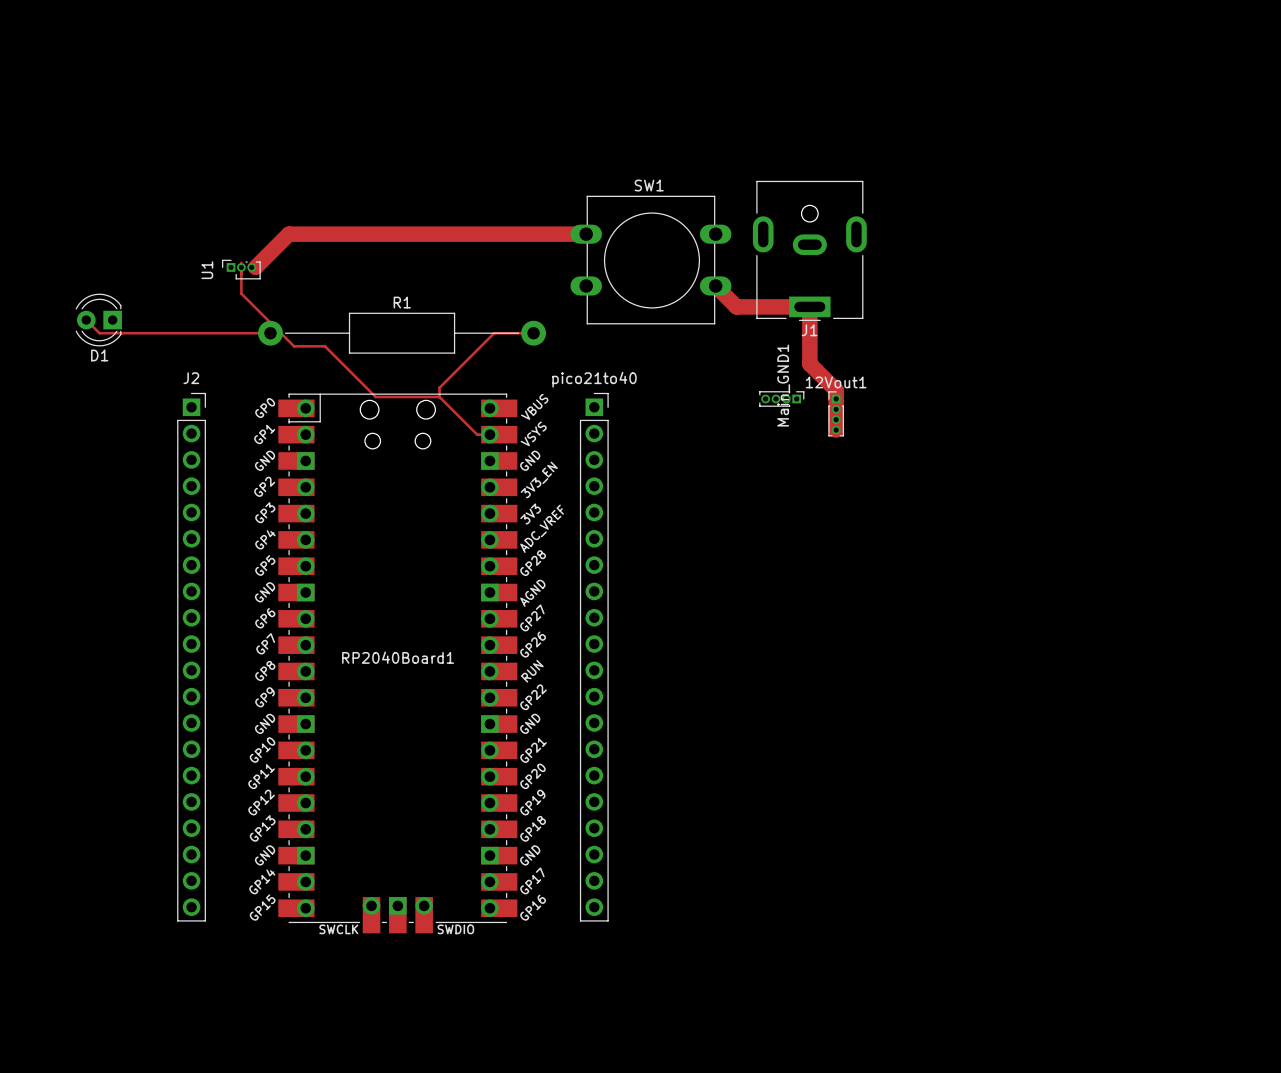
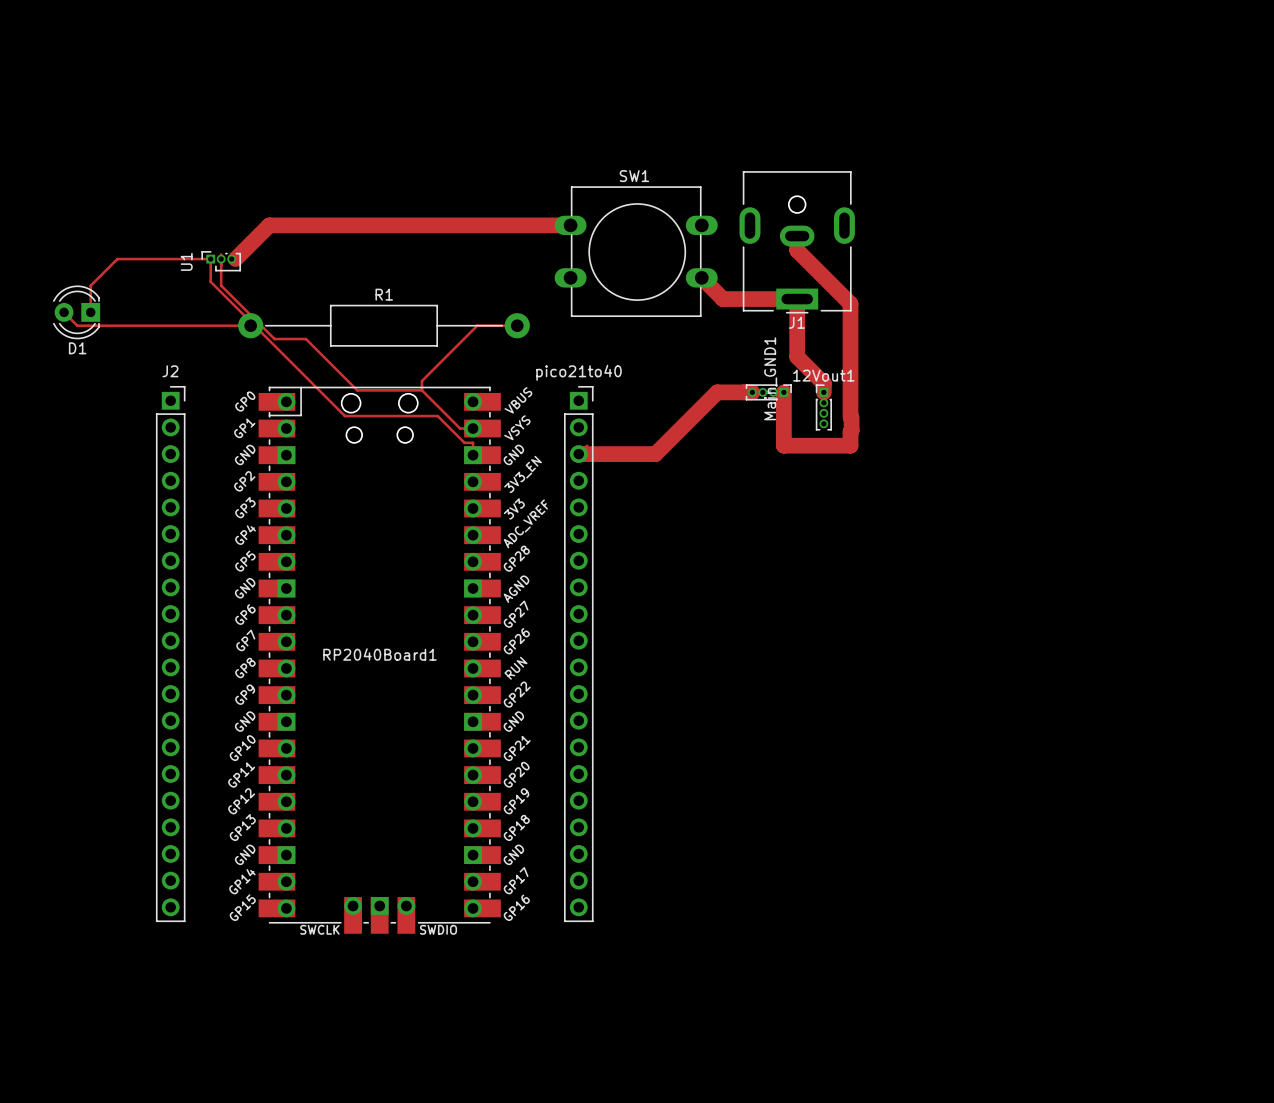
track: none -> (797, 236) (797, 250) (850, 303) (850, 417)
track: none -> (90, 312) (90, 285) (117, 259) (210, 259) (210, 281) (344, 416) (437, 416) (464, 442) (473, 442) (473, 455)
track: none -> (743, 392) (783, 392) (783, 445) (850, 445) (851, 417)
track: none -> (752, 392) (717, 392) (655, 454) (578, 454) (587, 445)
track: (836, 398) (836, 430) -> none

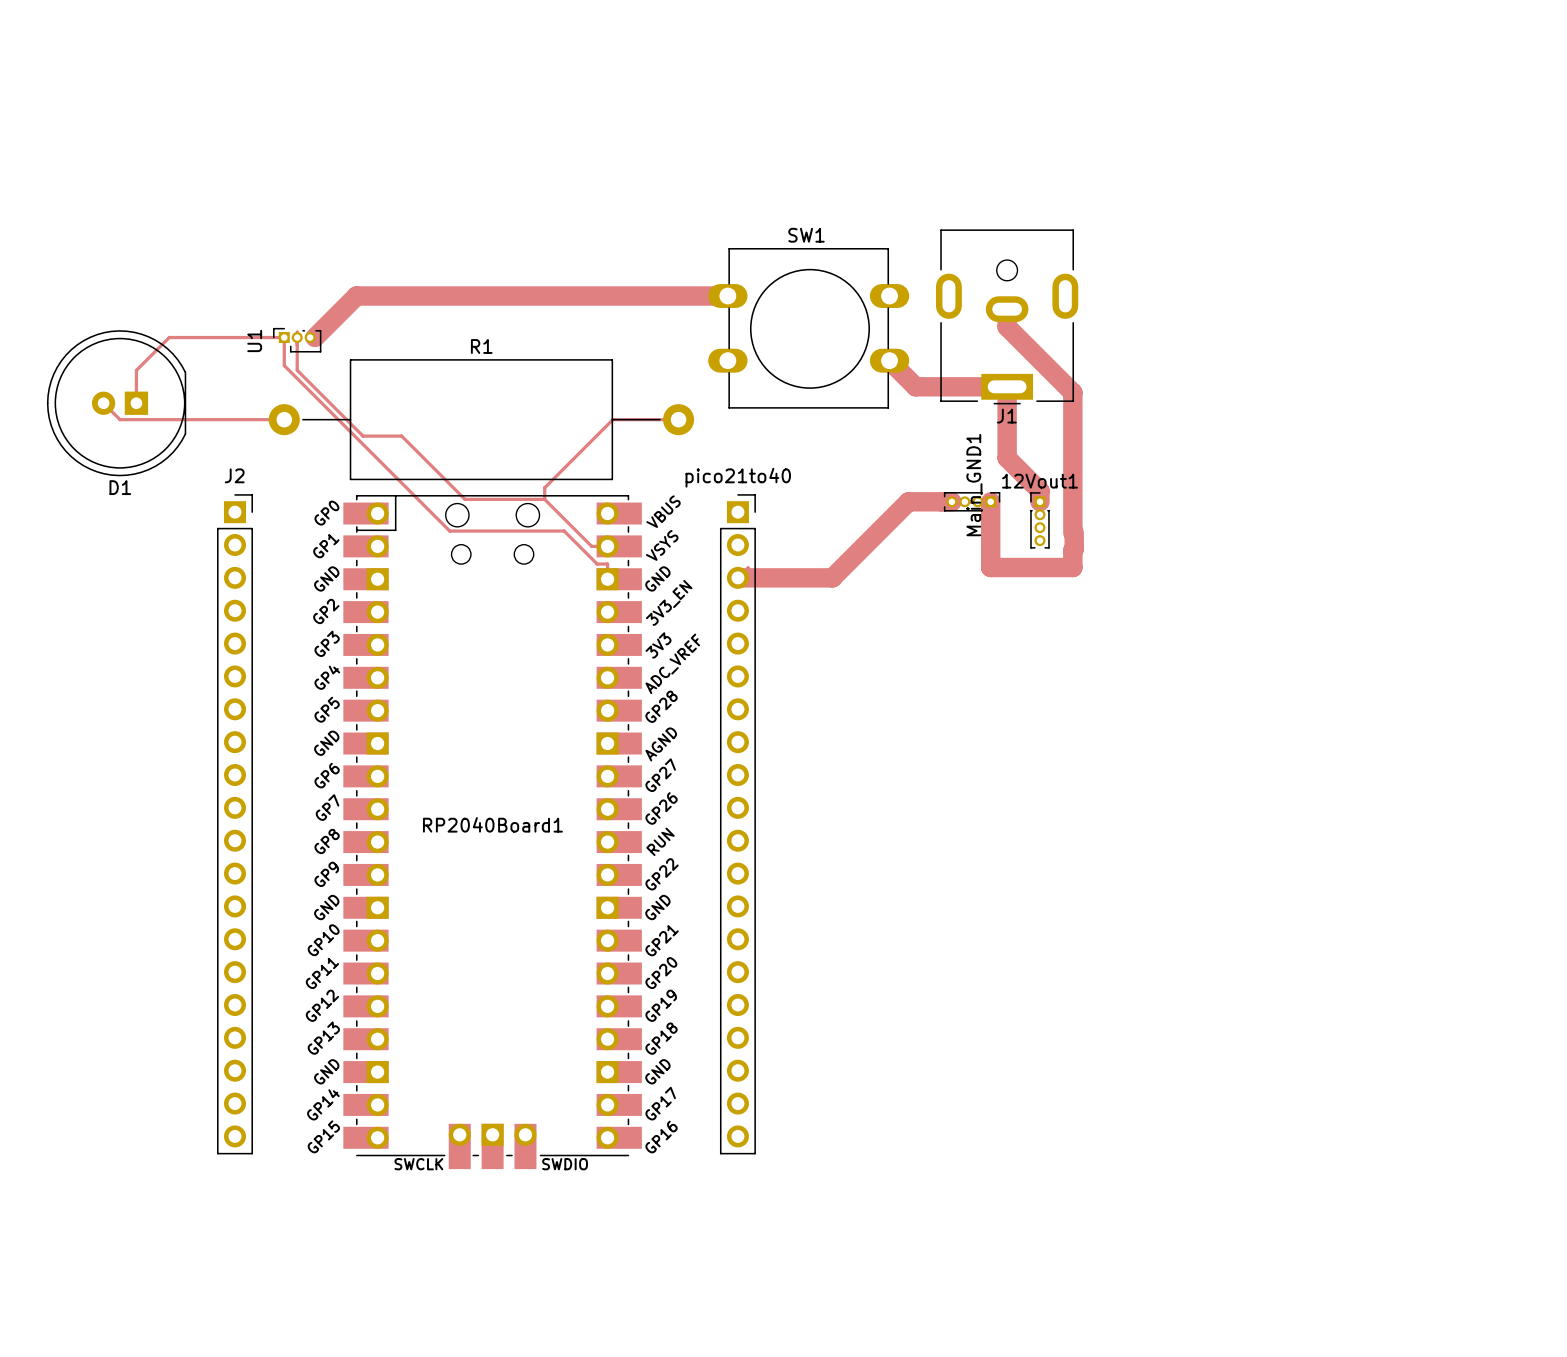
D1 footprint: [53, 285, 101, 340] -> [46, 330, 187, 477]
R1 name position: R1 (384, 294) -> R1 (481, 346)
R1 footprint: [238, 304, 530, 347] -> [268, 359, 695, 481]
track: (210, 325) (249, 327) -> none
D1 name position: D1 (77, 348) -> D1 (120, 487)

